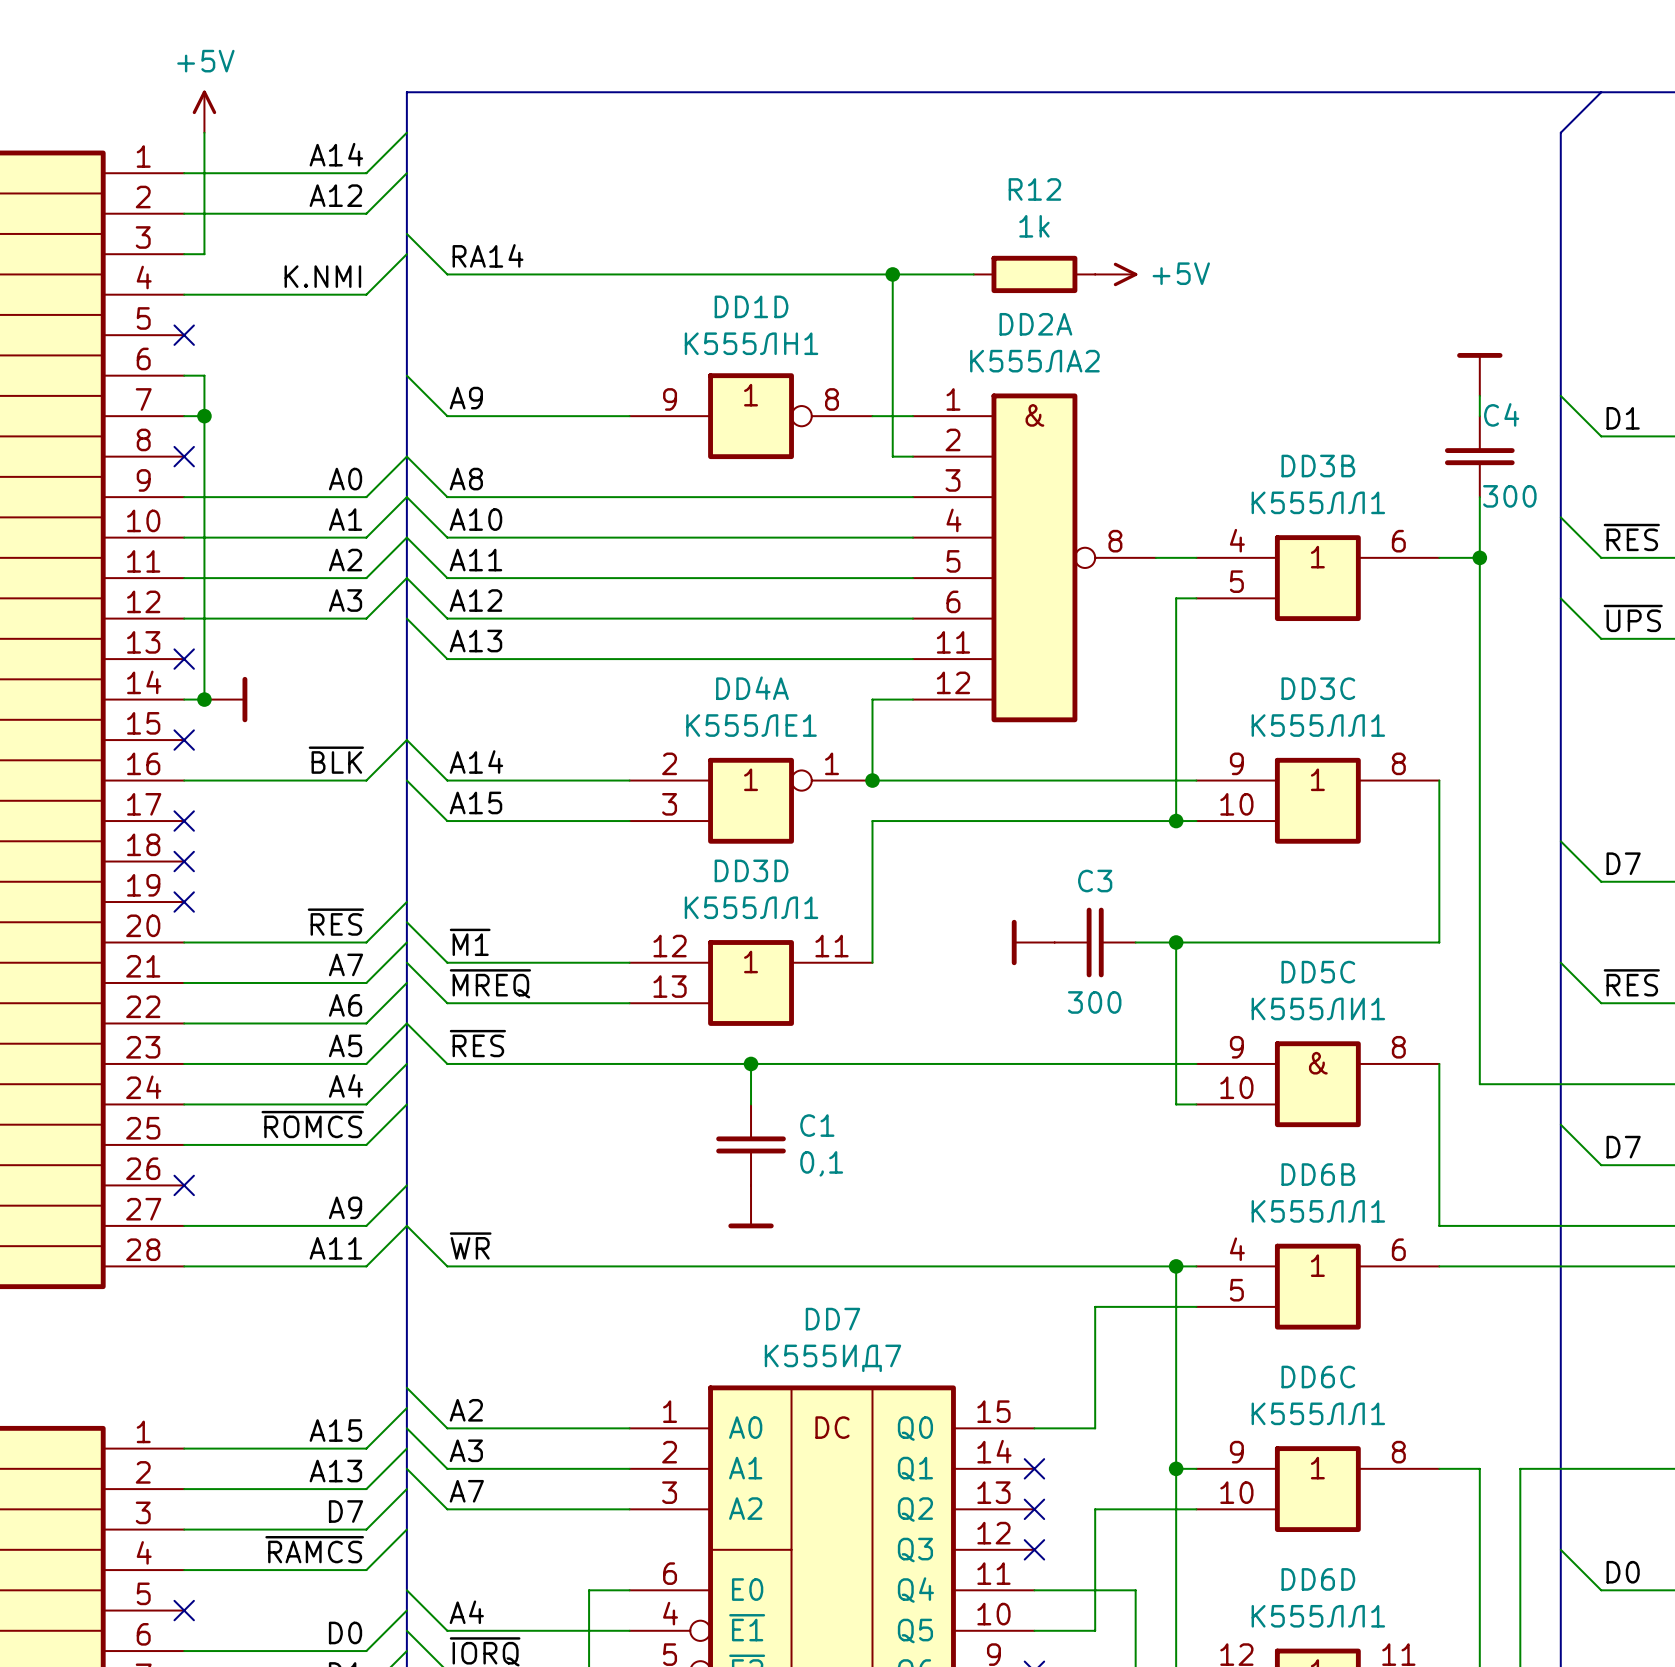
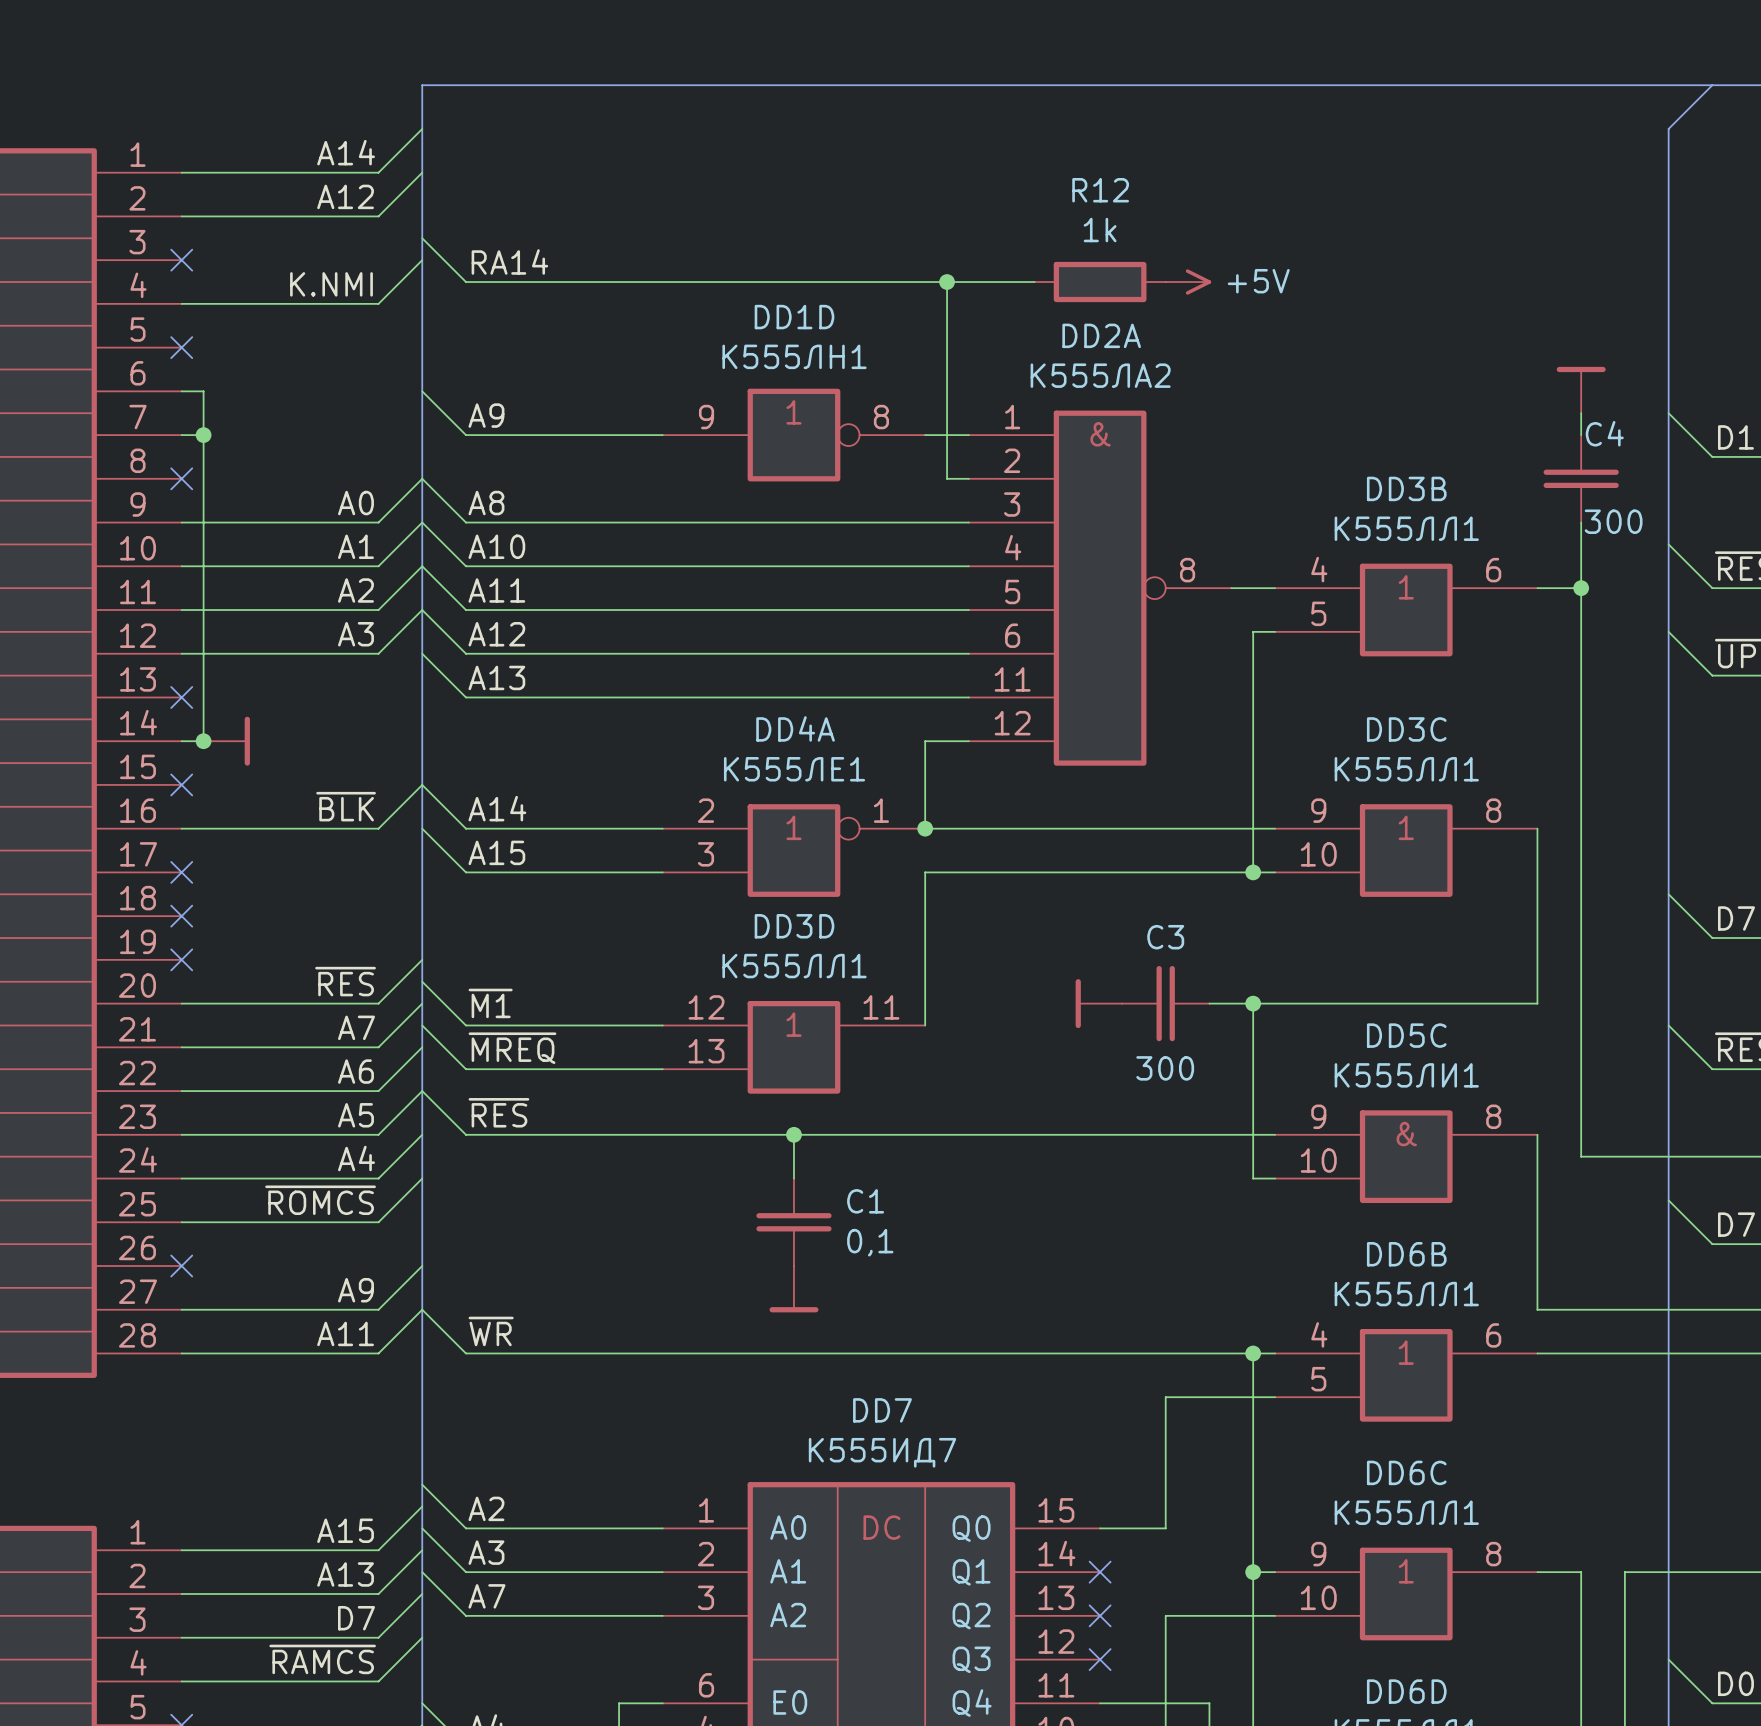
power symbol: +5V (204, 111) -> none
wire: (204, 132) (204, 254) (184, 254) -> none
no-connect mark: none -> (181, 260)

